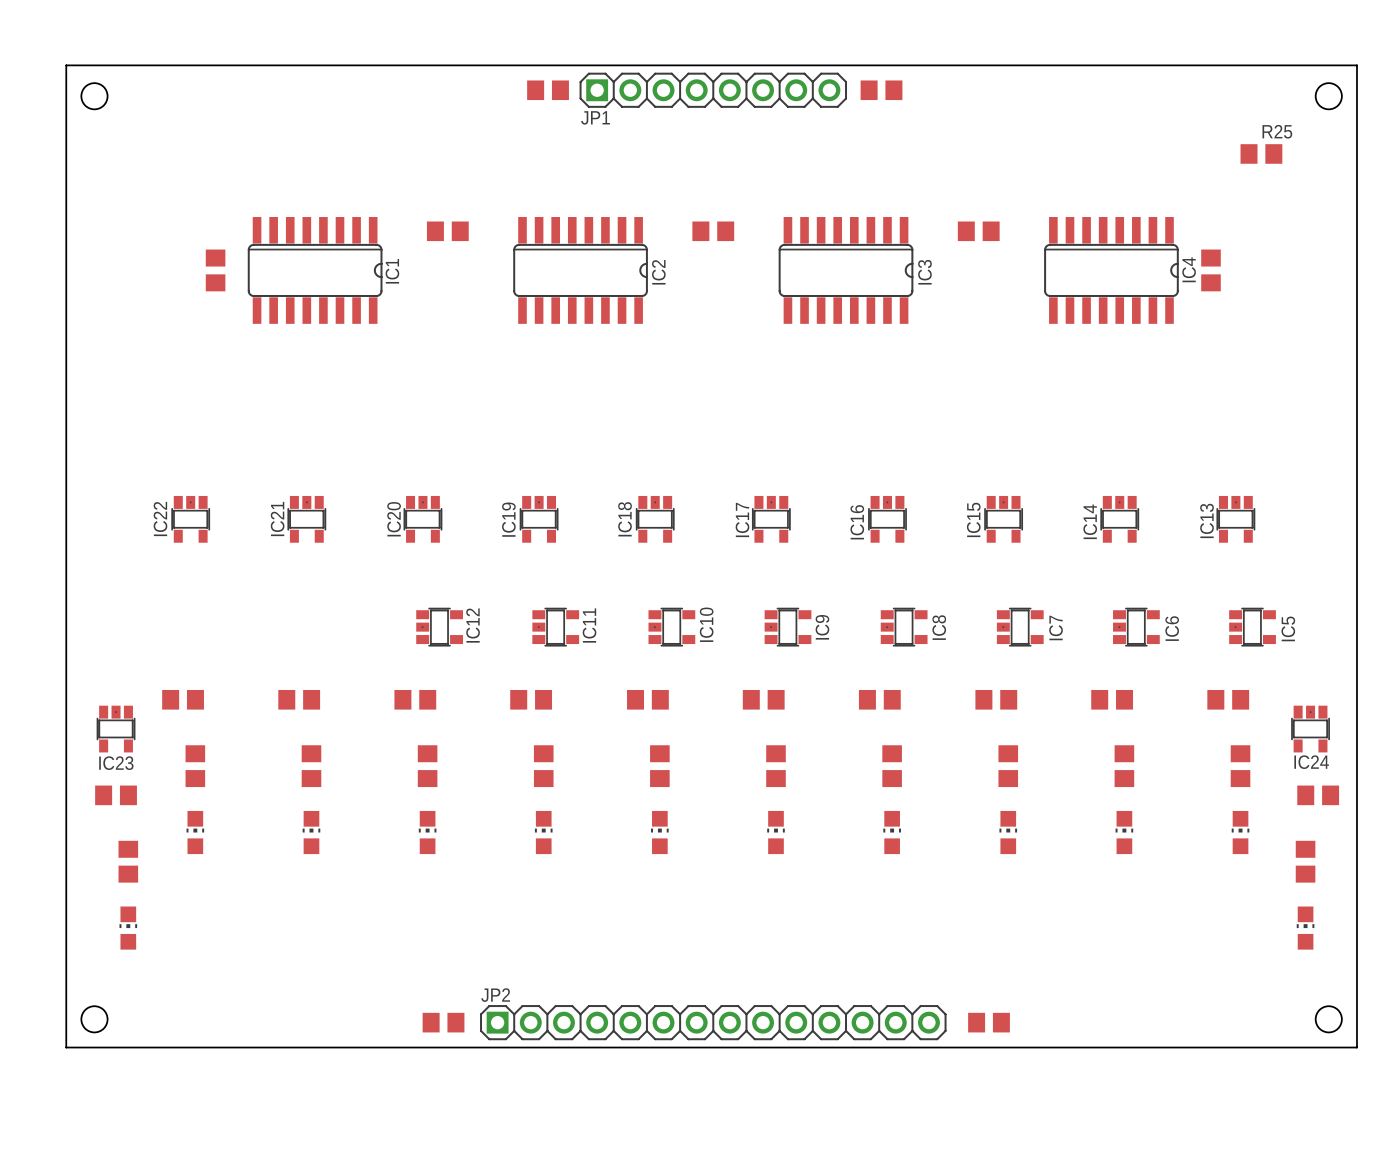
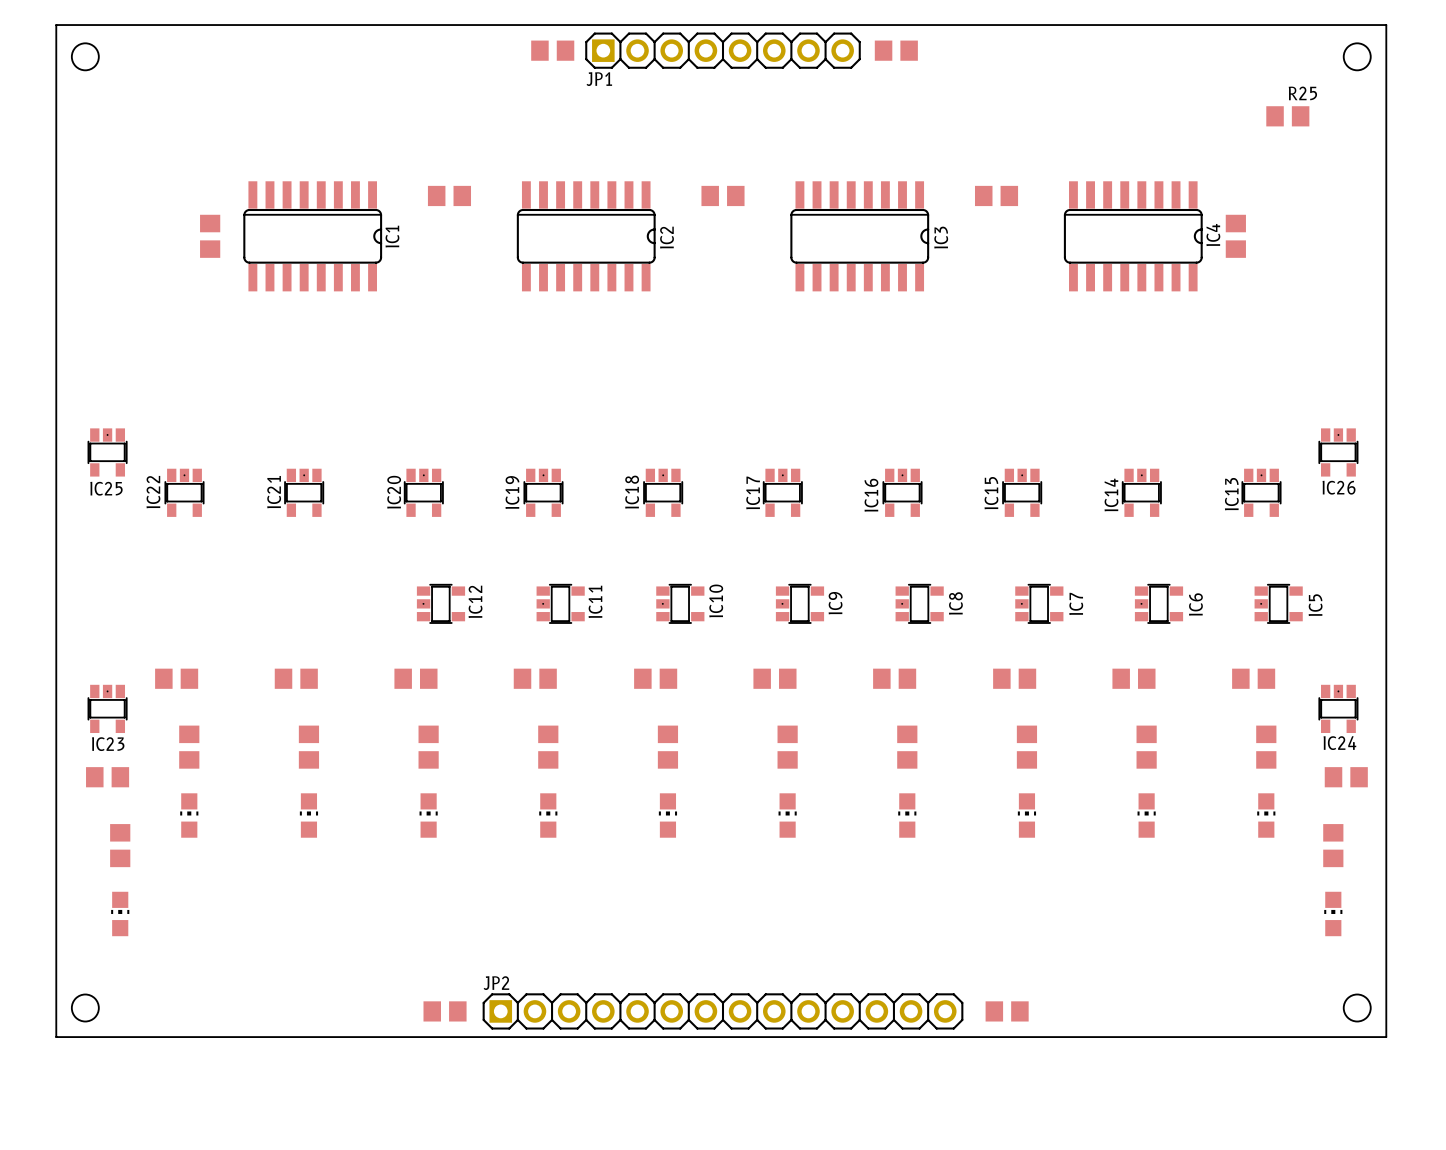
IC25: none -> (107, 452)
IC26: none -> (1338, 452)

